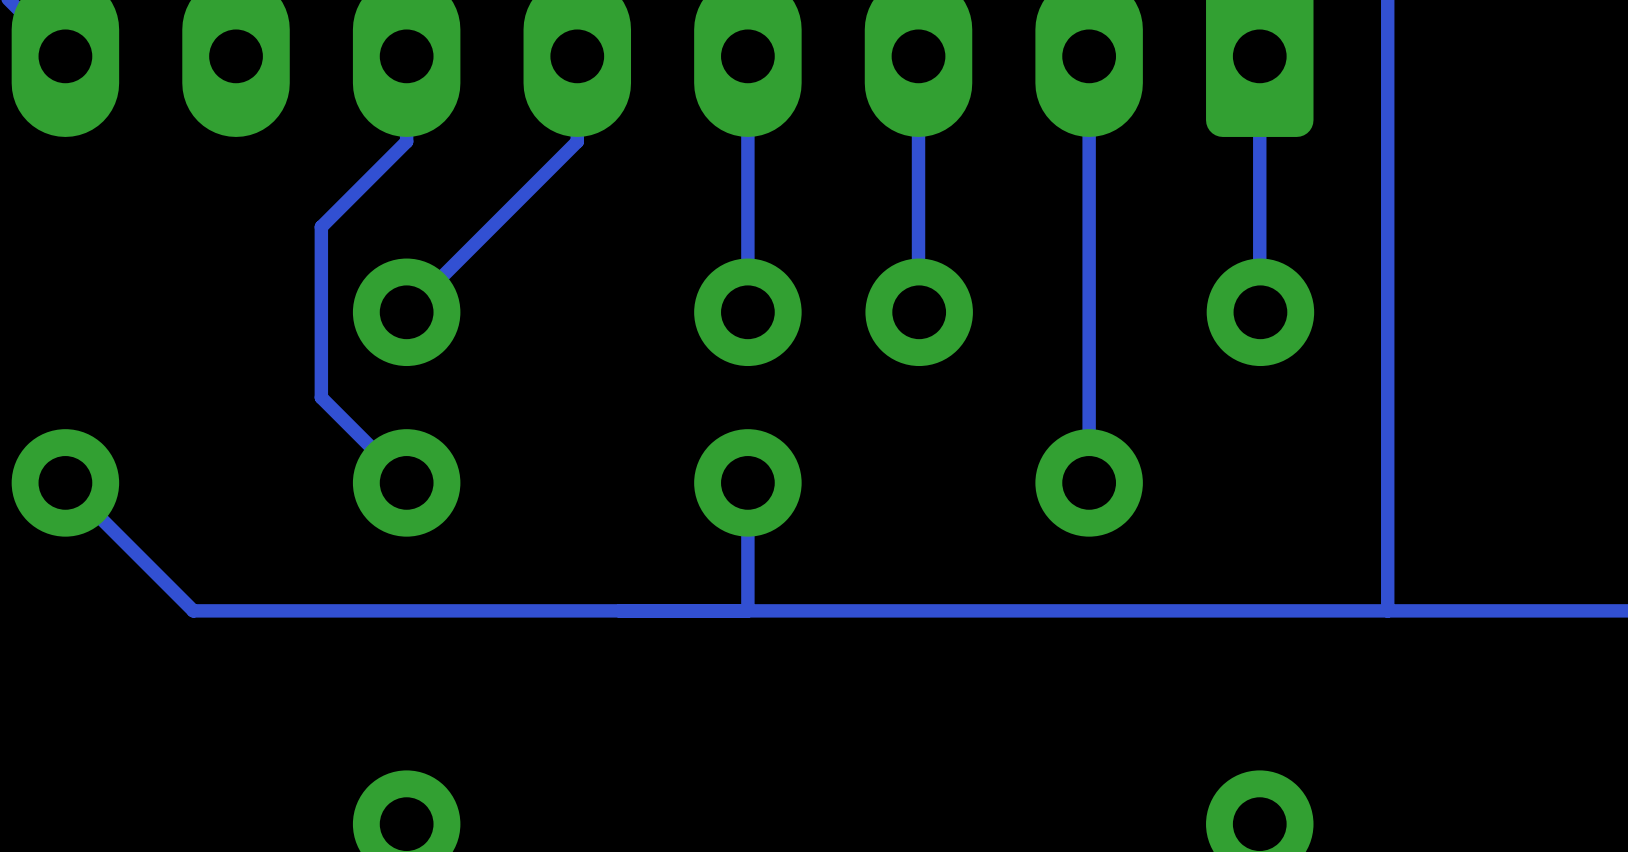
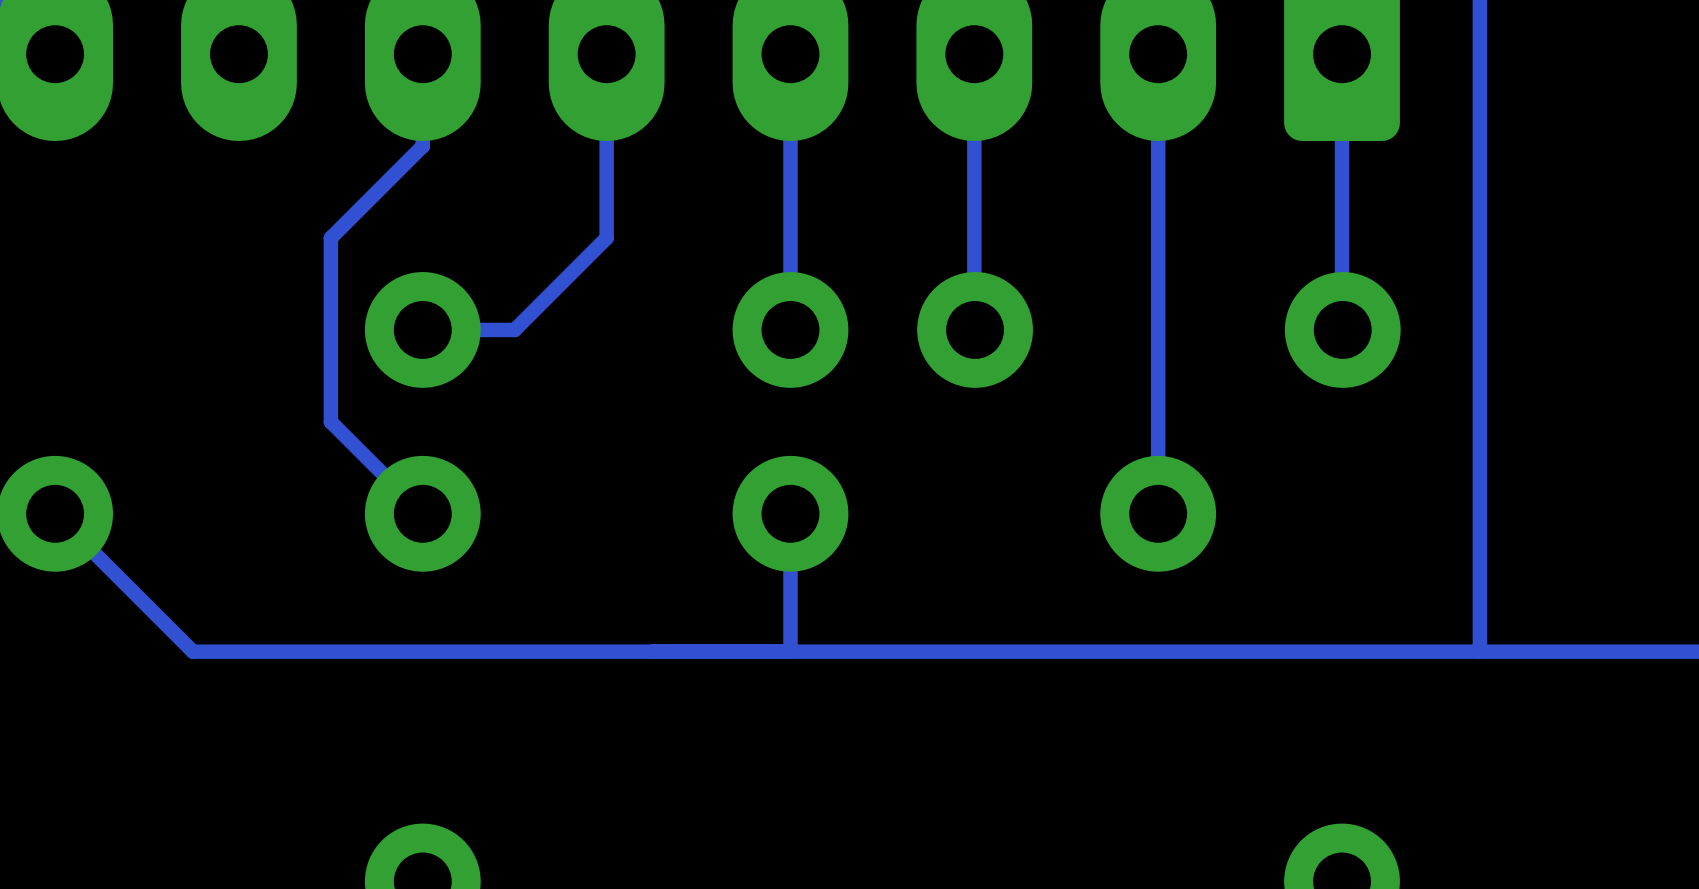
track: (577, 141) (406, 312) -> (606, 146) (606, 238) (514, 329) (422, 329)

